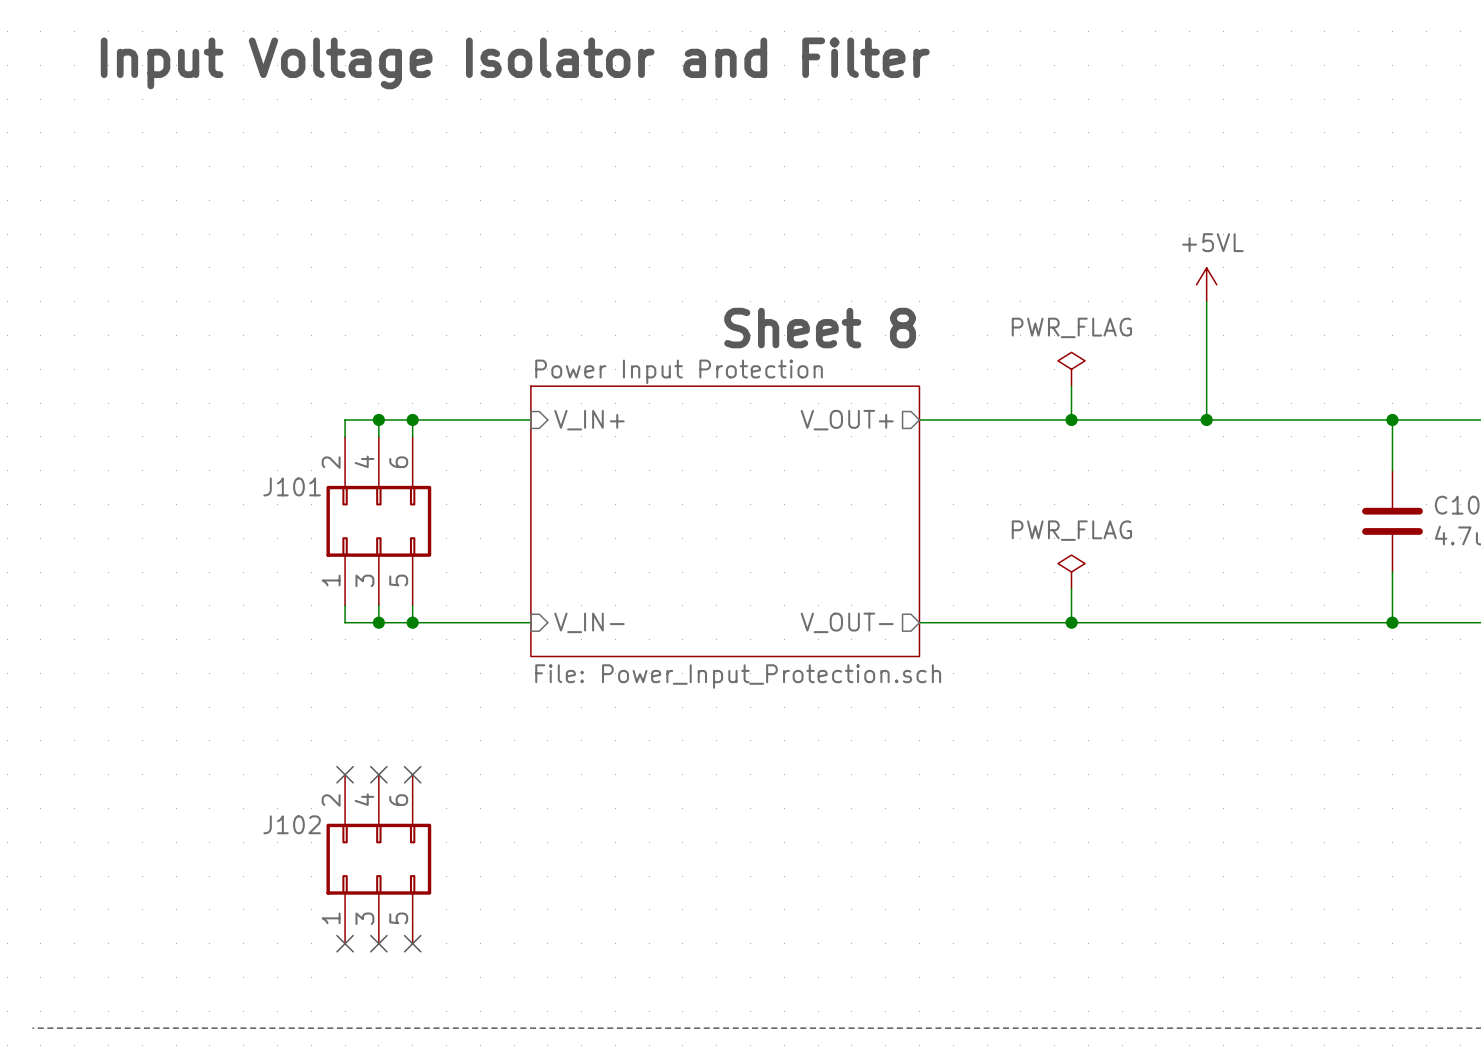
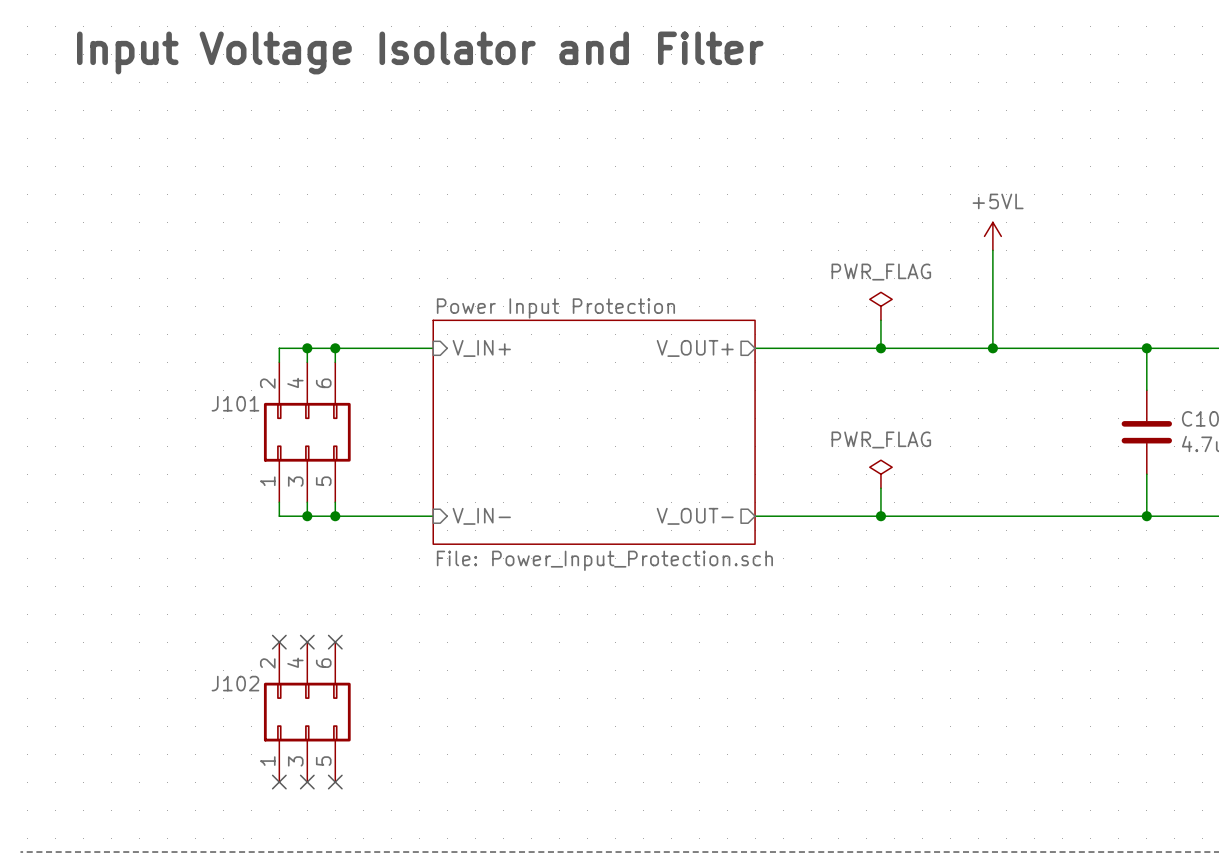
text: Sheet 8 (820, 328) -> none

